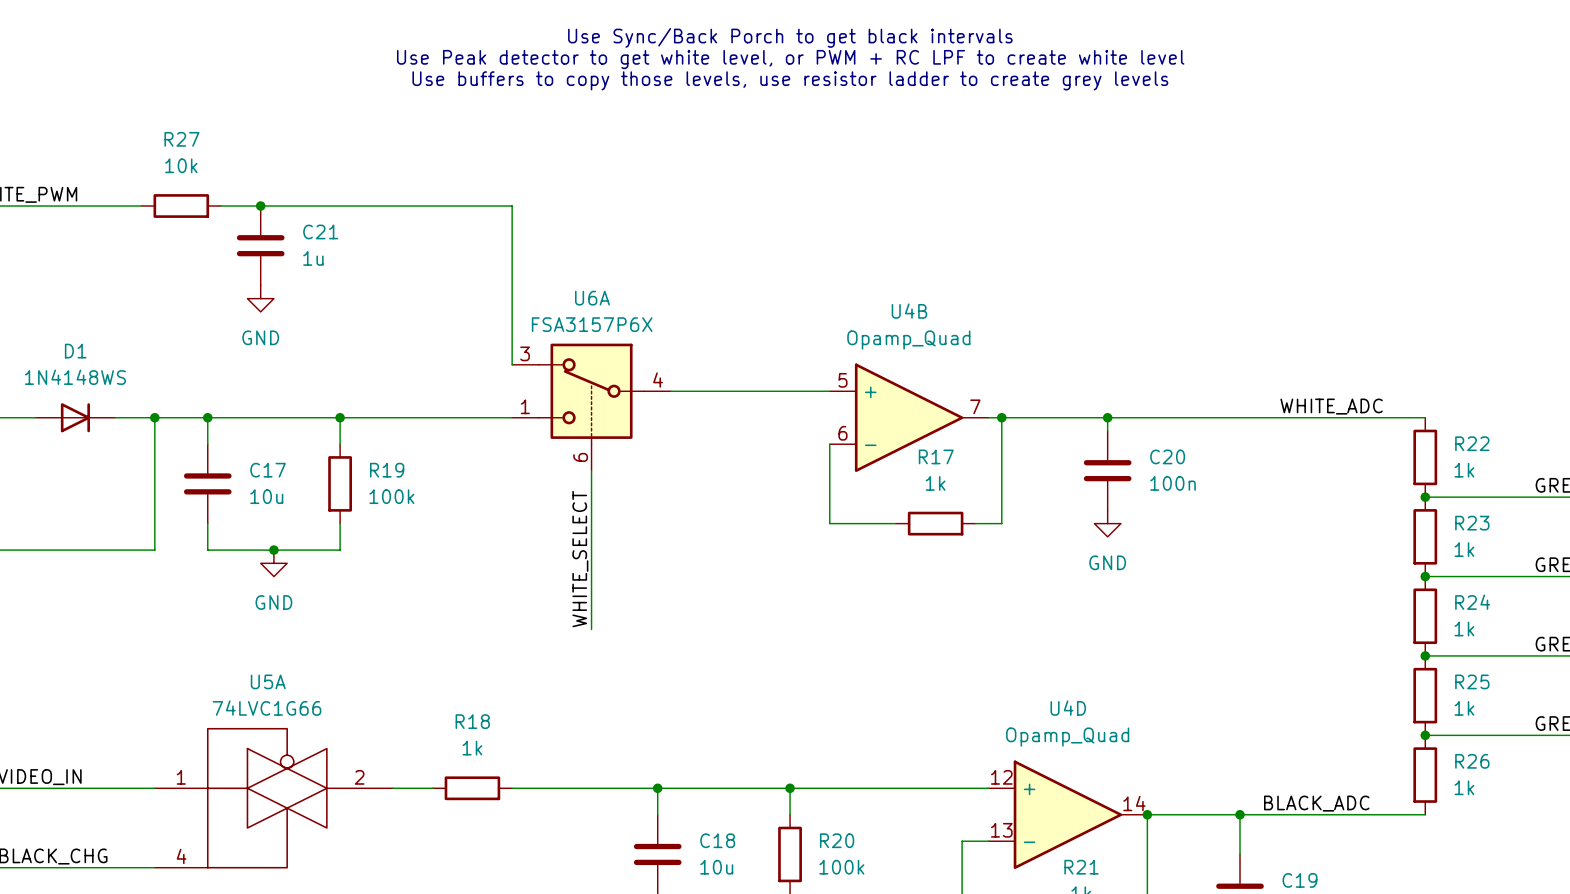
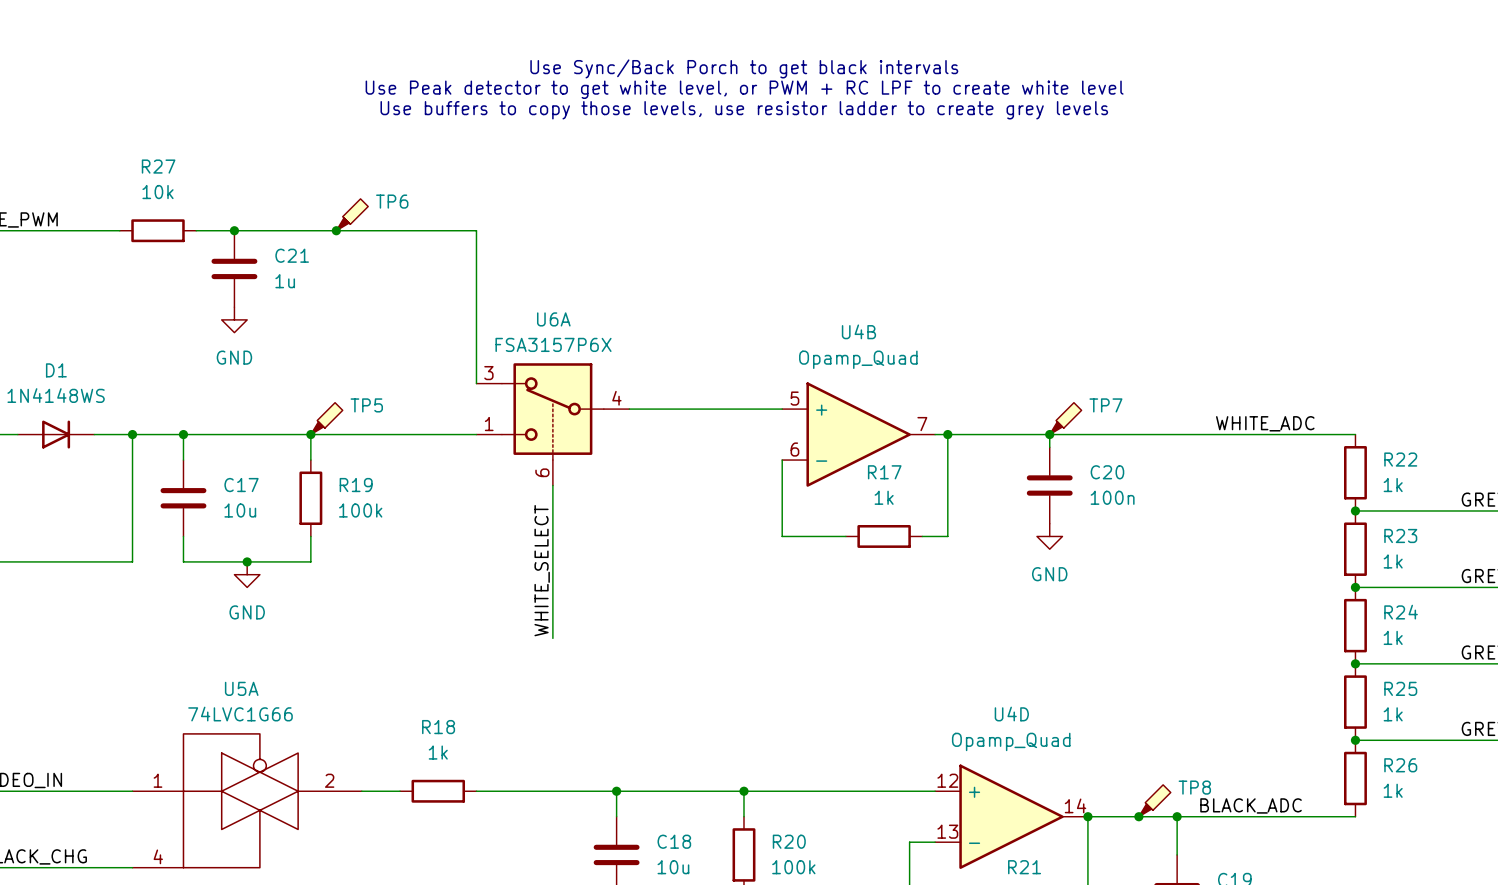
TP6: none -> (352, 214)
junction: none -> (336, 230)
TP5: none -> (326, 418)
TP7: none -> (1065, 418)
TP8: none -> (1154, 800)
junction: none -> (1138, 816)

